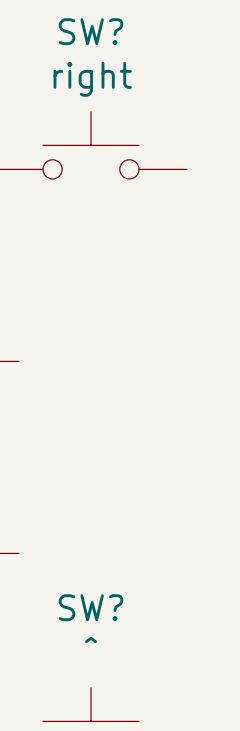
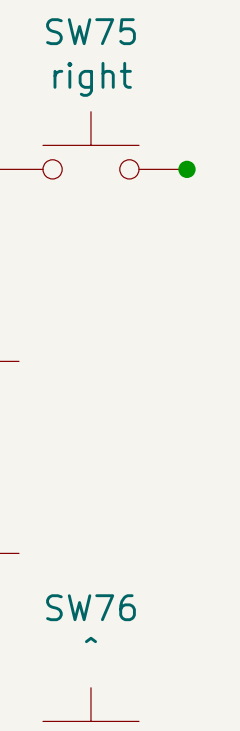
SW? name: SW? (90, 31) -> SW75 (90, 31)
junction: none -> (186, 169)
SW? name: SW? (90, 607) -> SW76 (90, 607)

